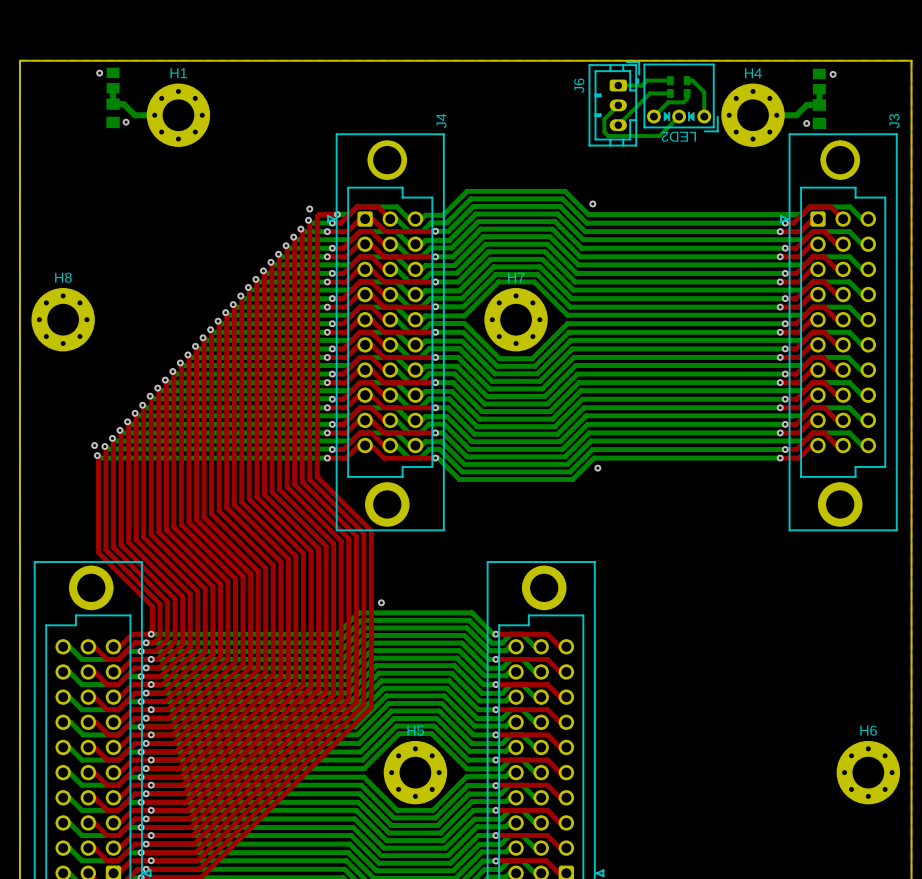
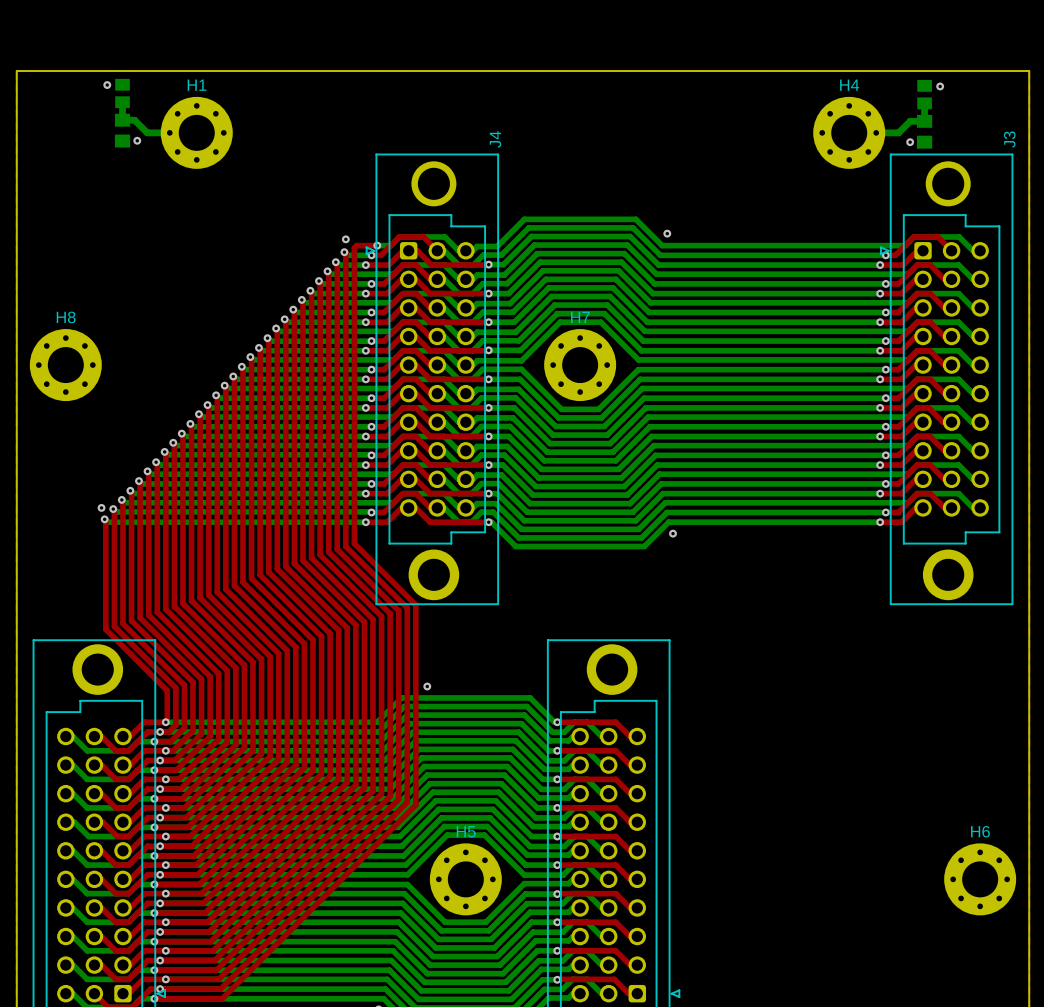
bottom track: (670, 80) (647, 80) (642, 85) (618, 85) -> none
part: (678, 80) -> none
bottom track: (687, 80) (692, 80) (704, 92) (704, 116) -> none
bottom track: (670, 93) (650, 93) (618, 125) -> none
part: (678, 93) -> none
bottom track: (687, 93) (687, 98) (683, 102) (668, 102) (653, 116) -> none
LED2: (681, 97) -> none
J6: (614, 103) -> none
bottom track: (618, 105) (604, 119) (604, 132) (608, 136) (659, 136) (679, 116) -> none

